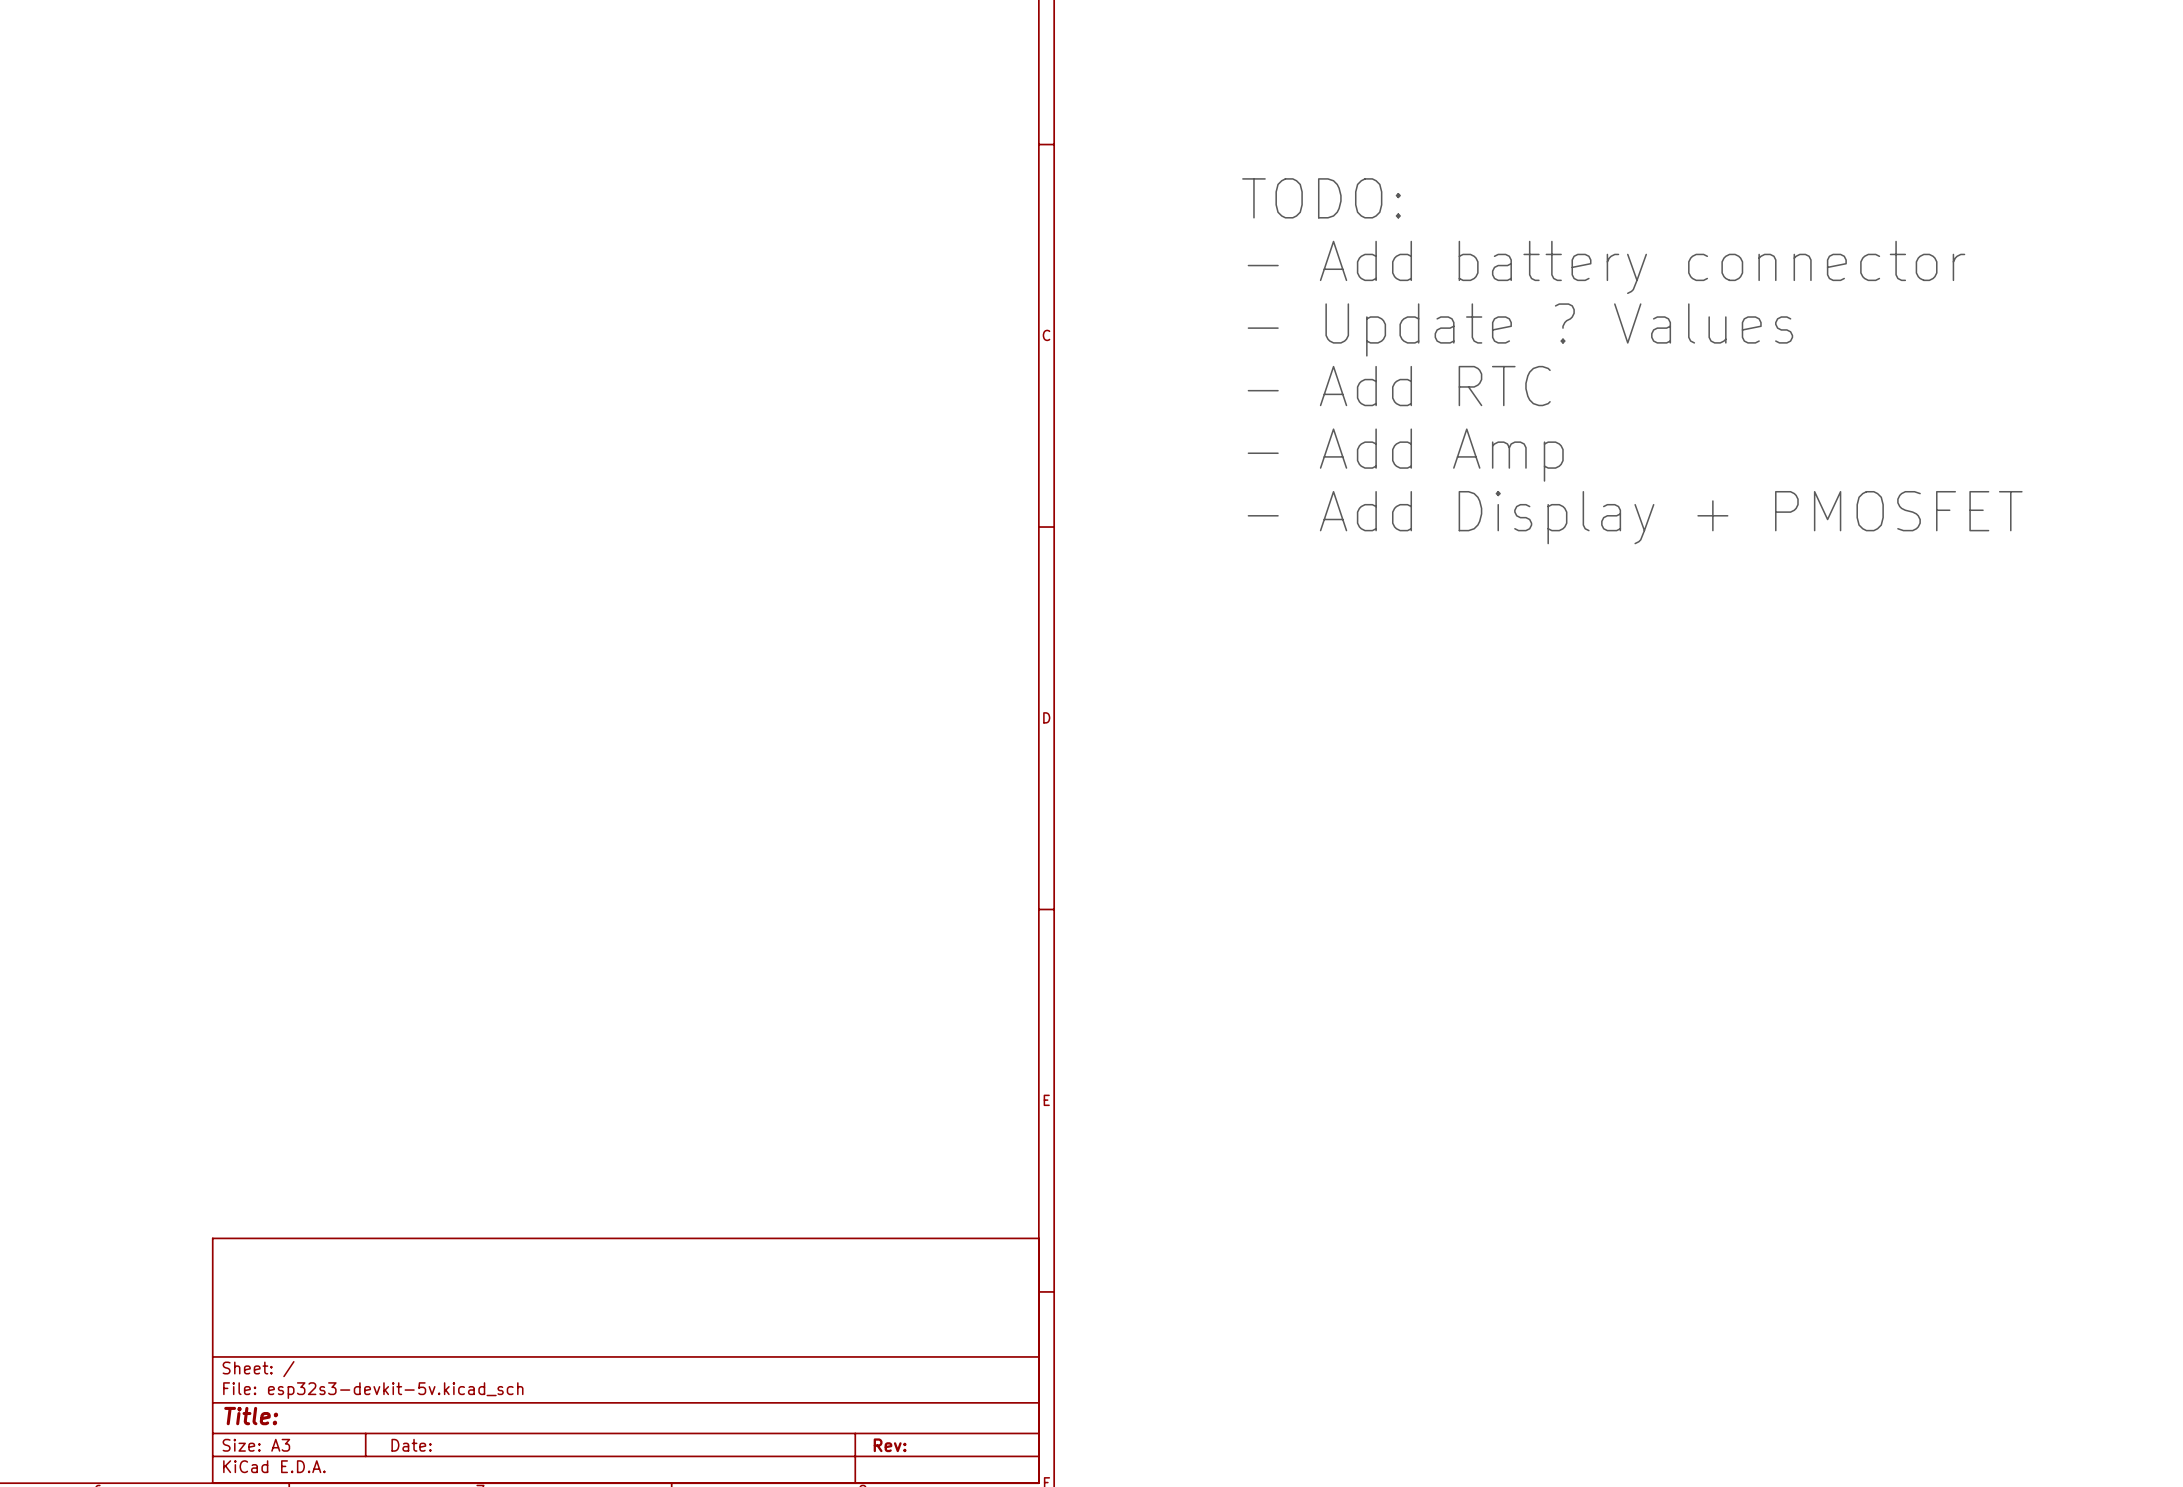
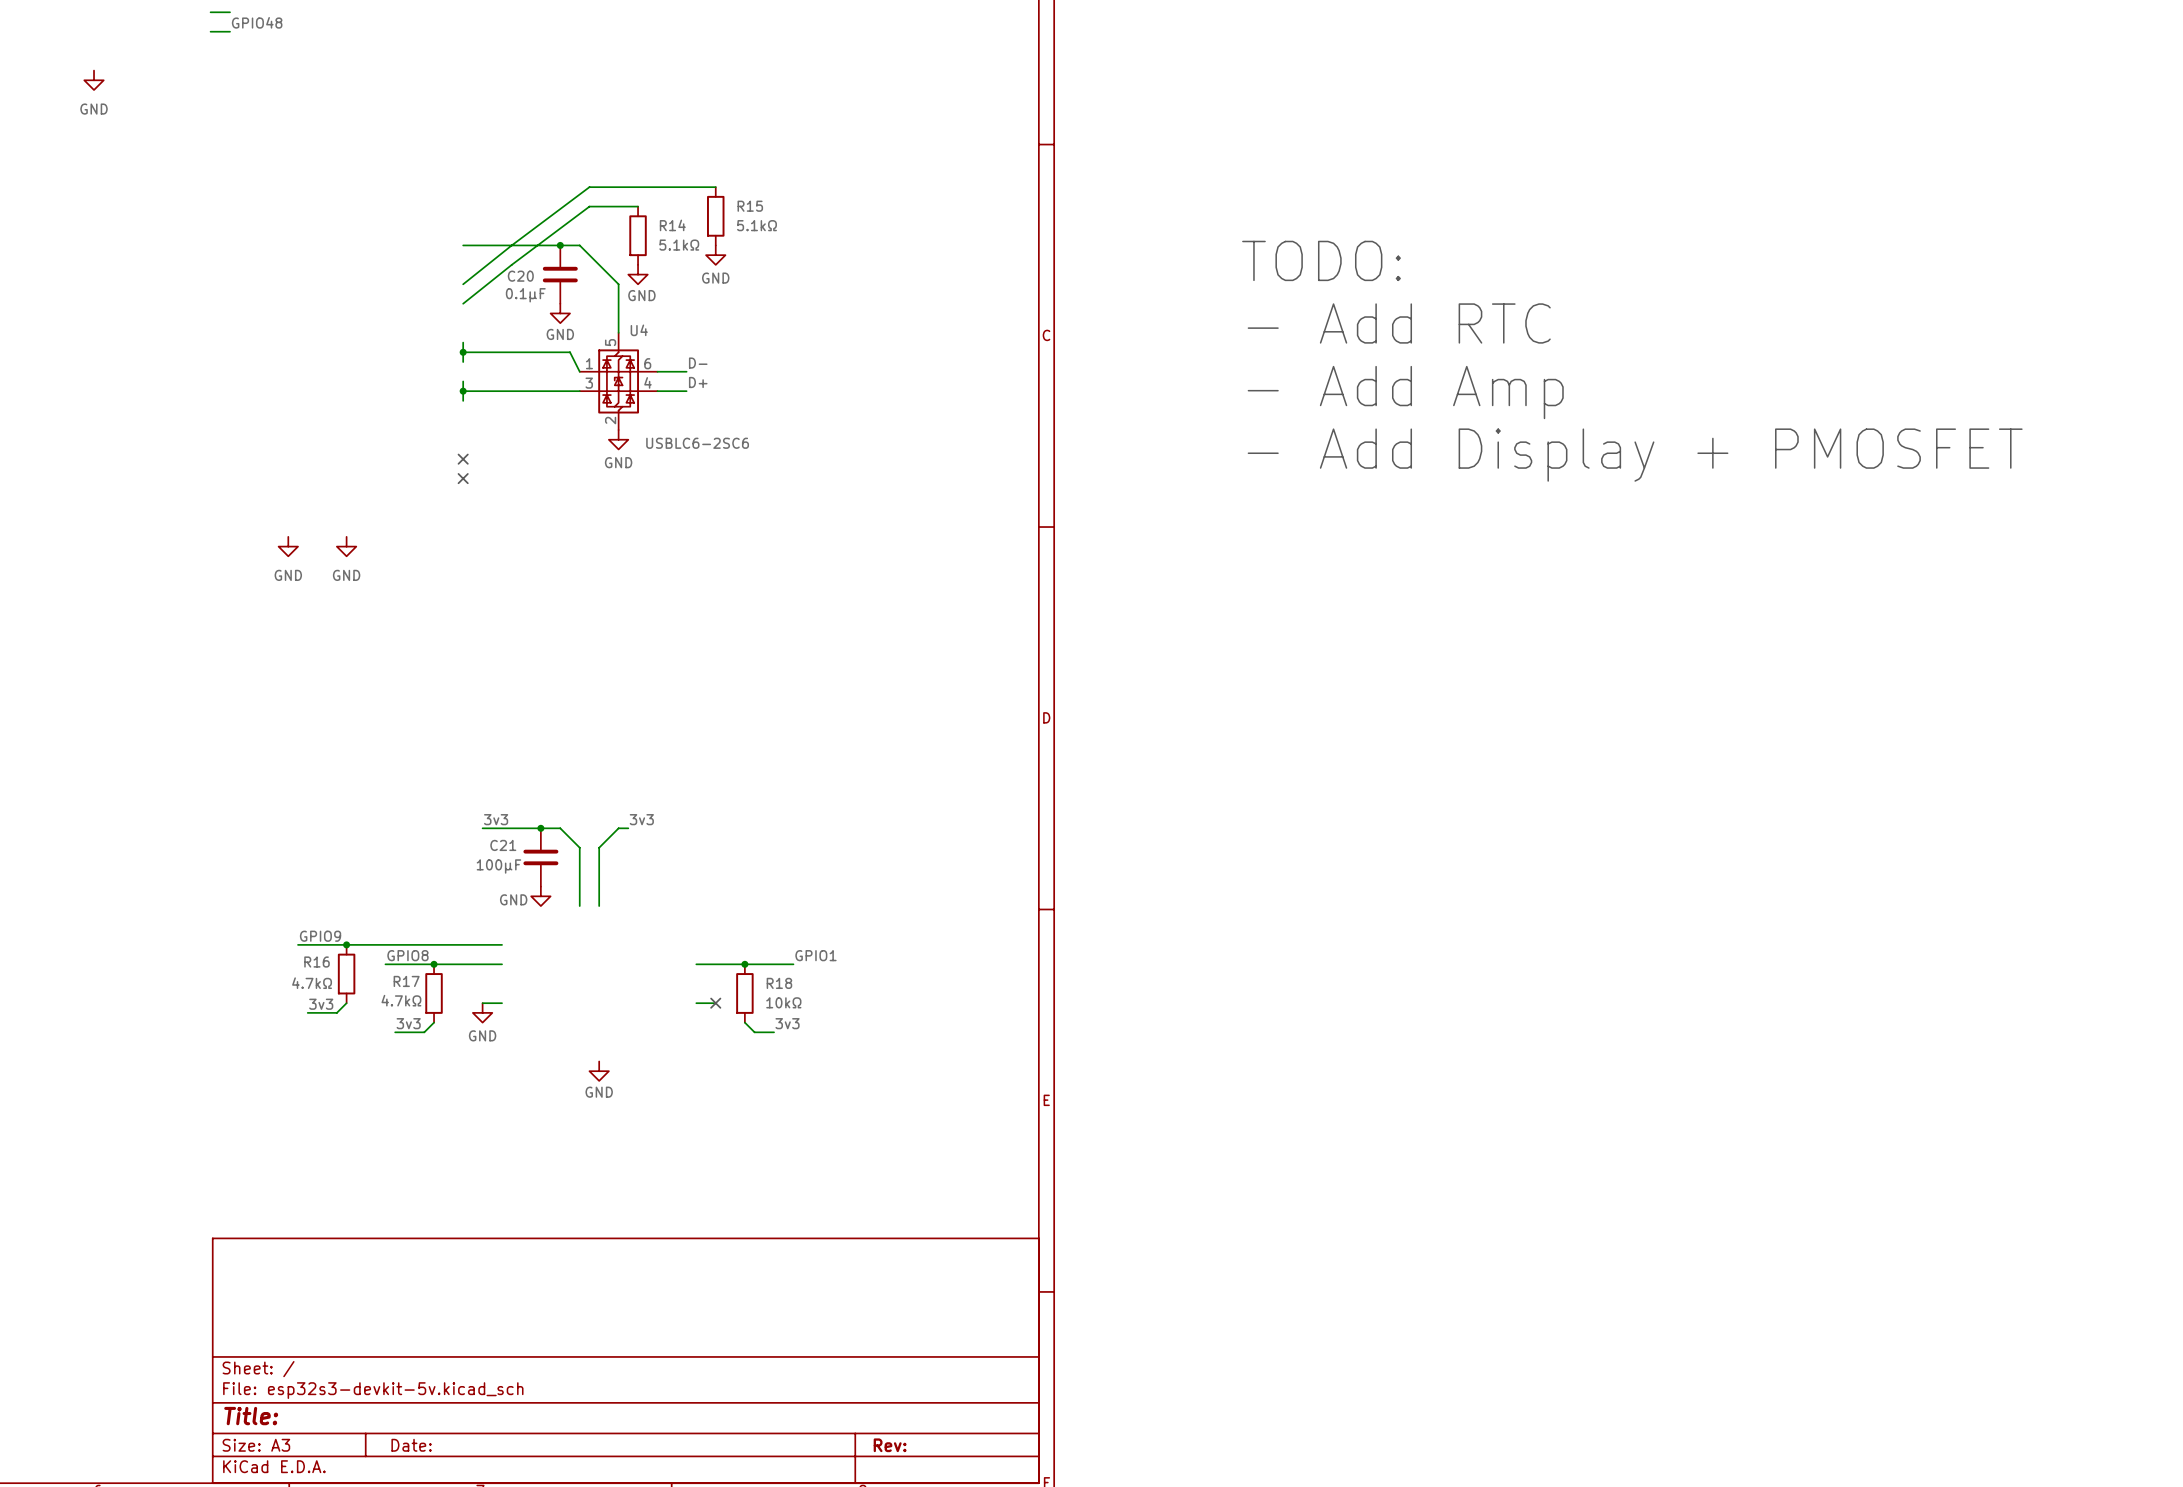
wire: none -> (210, 12) (230, 12)
label: none -> GPIO48 (257, 22)
wire: none -> (210, 31) (230, 31)
power symbol: none -> GND (94, 80)
wire: none -> (715, 187) (589, 187) (463, 284)
text: TODO: (1321, 198) -> none
wire: none -> (638, 206) (589, 206) (463, 303)
R15: none -> 5.1kΩ (715, 216)
R14: none -> 5.1kΩ (638, 235)
wire: none -> (463, 245) (579, 245) (618, 284) (618, 332)
junction: none -> (560, 245)
power symbol: none -> GND (715, 255)
text: - Add battery connector (1606, 267) -> TODO: (1321, 260)
C20: none -> 0.1µF (560, 274)
power symbol: none -> GND (638, 274)
power symbol: none -> GND (560, 313)
text: - Update ? Values (1520, 329) -> - Add RTC (1399, 323)
wire: none -> (463, 342) (463, 362)
wire: none -> (463, 352) (570, 352) (579, 371)
junction: none -> (463, 352)
label: none -> D- (698, 363)
wire: none -> (657, 371) (686, 371)
wire: none -> (463, 381) (463, 400)
U4: none -> USBLC6-2SC6 (618, 381)
label: none -> D+ (698, 382)
text: - Add RTC (1399, 386) -> - Add Amp (1405, 392)
wire: none -> (463, 391) (579, 391)
junction: none -> (463, 391)
wire: none -> (657, 391) (686, 391)
power symbol: none -> GND (618, 439)
text: - Add Amp (1405, 455) -> - Add Display + PMOSFET (1635, 455)
no-connect mark: none -> (463, 459)
no-connect mark: none -> (463, 478)
text: - Add Display + PMOSFET (1635, 517) -> none
power symbol: none -> GND (288, 546)
power symbol: none -> GND (346, 546)
label: none -> 3v3 (496, 819)
label: none -> 3v3 (641, 819)
wire: none -> (482, 828) (560, 828) (579, 847) (579, 906)
junction: none -> (540, 828)
wire: none -> (628, 828) (618, 828) (599, 847) (599, 906)
C21: none -> 100µF (540, 857)
power symbol: none -> GND (540, 896)
label: none -> GPIO9 (320, 936)
wire: none -> (298, 944) (502, 944)
junction: none -> (346, 944)
label: none -> GPIO8 (407, 955)
label: none -> GPIO1 (815, 955)
wire: none -> (385, 964) (502, 964)
junction: none -> (434, 964)
wire: none -> (696, 964) (793, 964)
junction: none -> (744, 964)
R16: none -> 4.7kΩ (346, 974)
R17: none -> 4.7kΩ (434, 993)
R18: none -> 10kΩ (744, 993)
wire: none -> (346, 1003) (336, 1012) (307, 1012)
wire: none -> (482, 1003) (502, 1003)
wire: none -> (696, 1003) (715, 1003)
no-connect mark: none -> (715, 1003)
label: none -> 3v3 (321, 1004)
power symbol: none -> GND (482, 1012)
wire: none -> (434, 1022) (424, 1032) (395, 1032)
wire: none -> (744, 1022) (754, 1032) (774, 1032)
label: none -> 3v3 (408, 1023)
label: none -> 3v3 (787, 1023)
power symbol: none -> GND (599, 1071)

